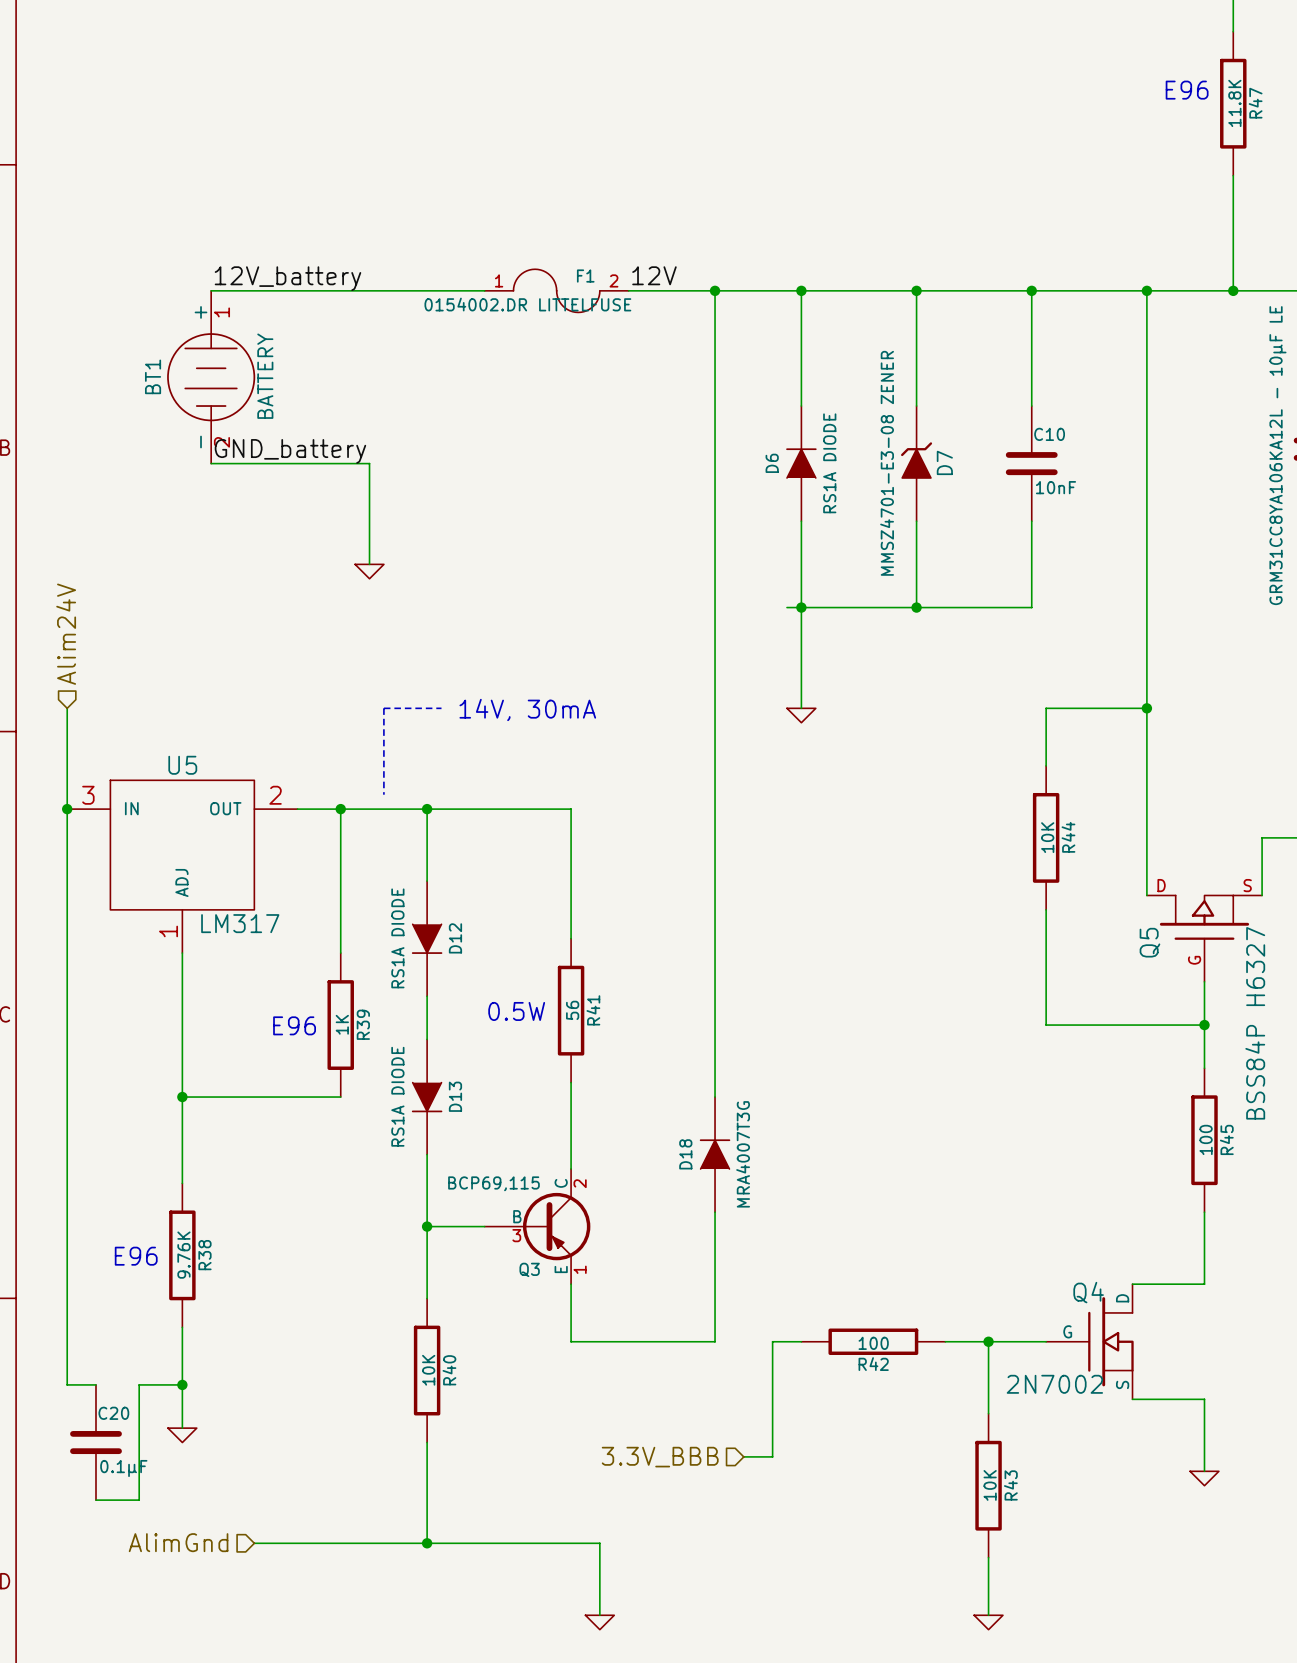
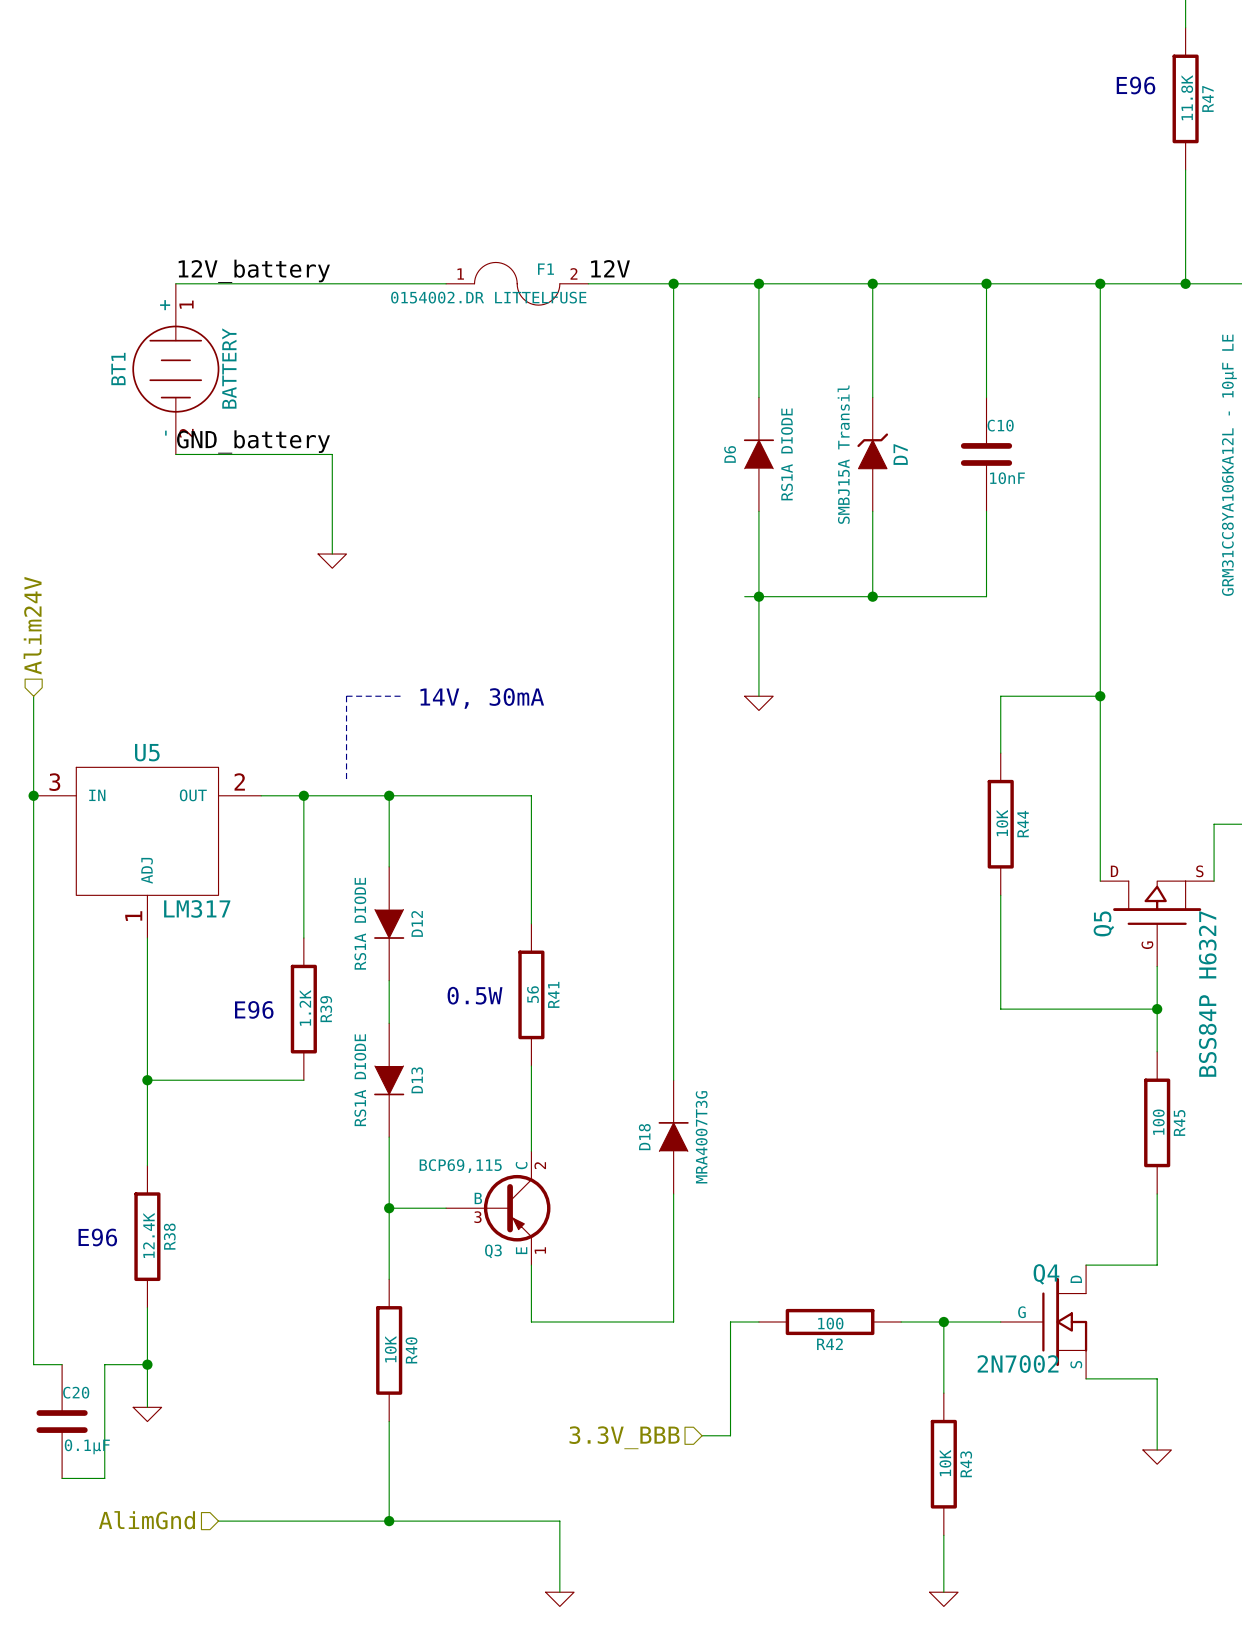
D7 value: MMSZ4701-E3-08 ZENER (887, 463) -> SMBJ15A Transil (843, 454)
R39 value: 1K (342, 1024) -> 1.2K (305, 1007)
R38 value: 9.76K (183, 1255) -> 12.4K (148, 1235)

